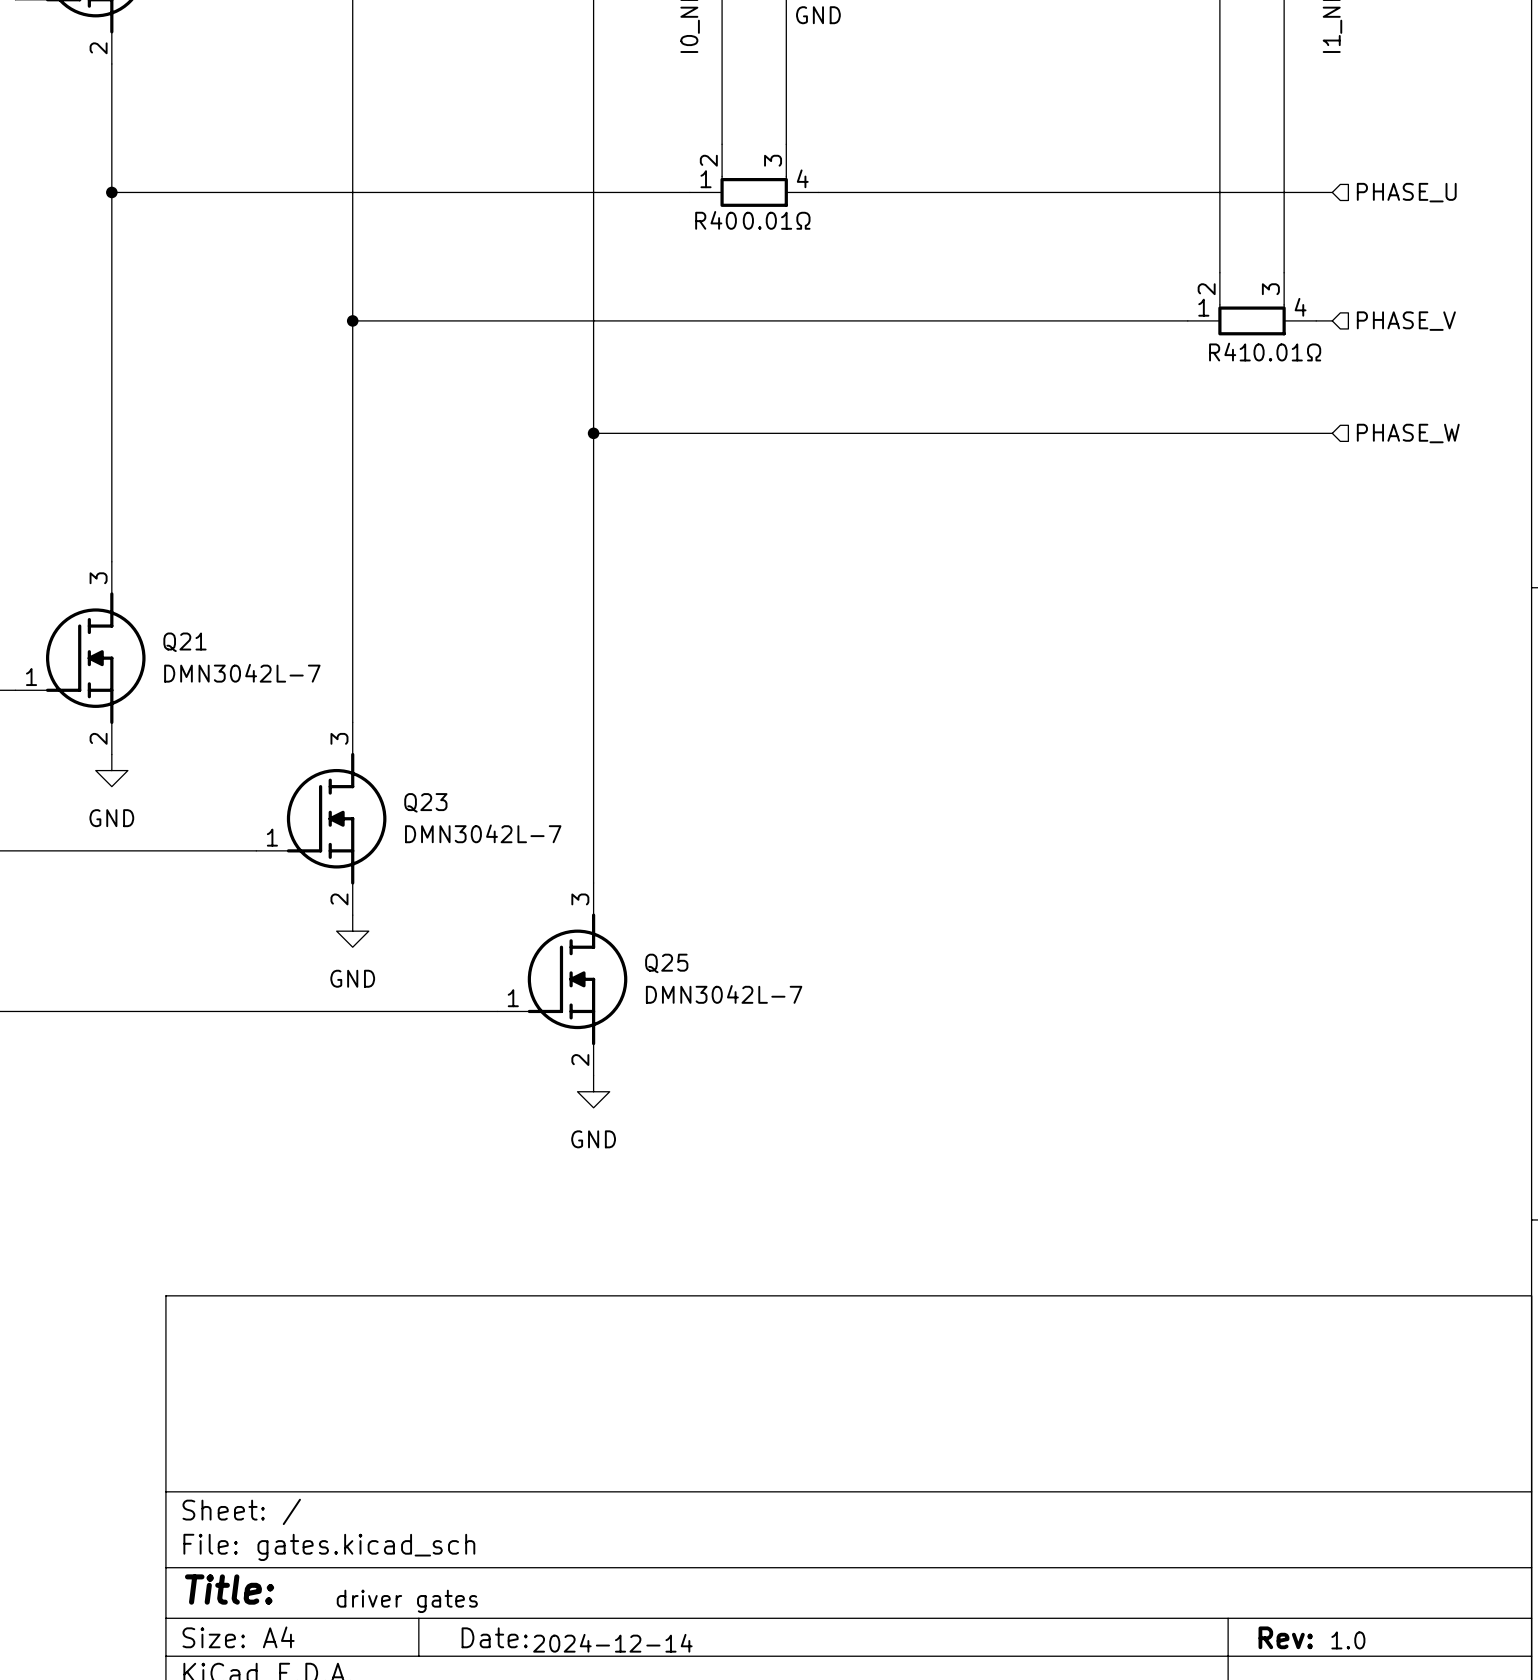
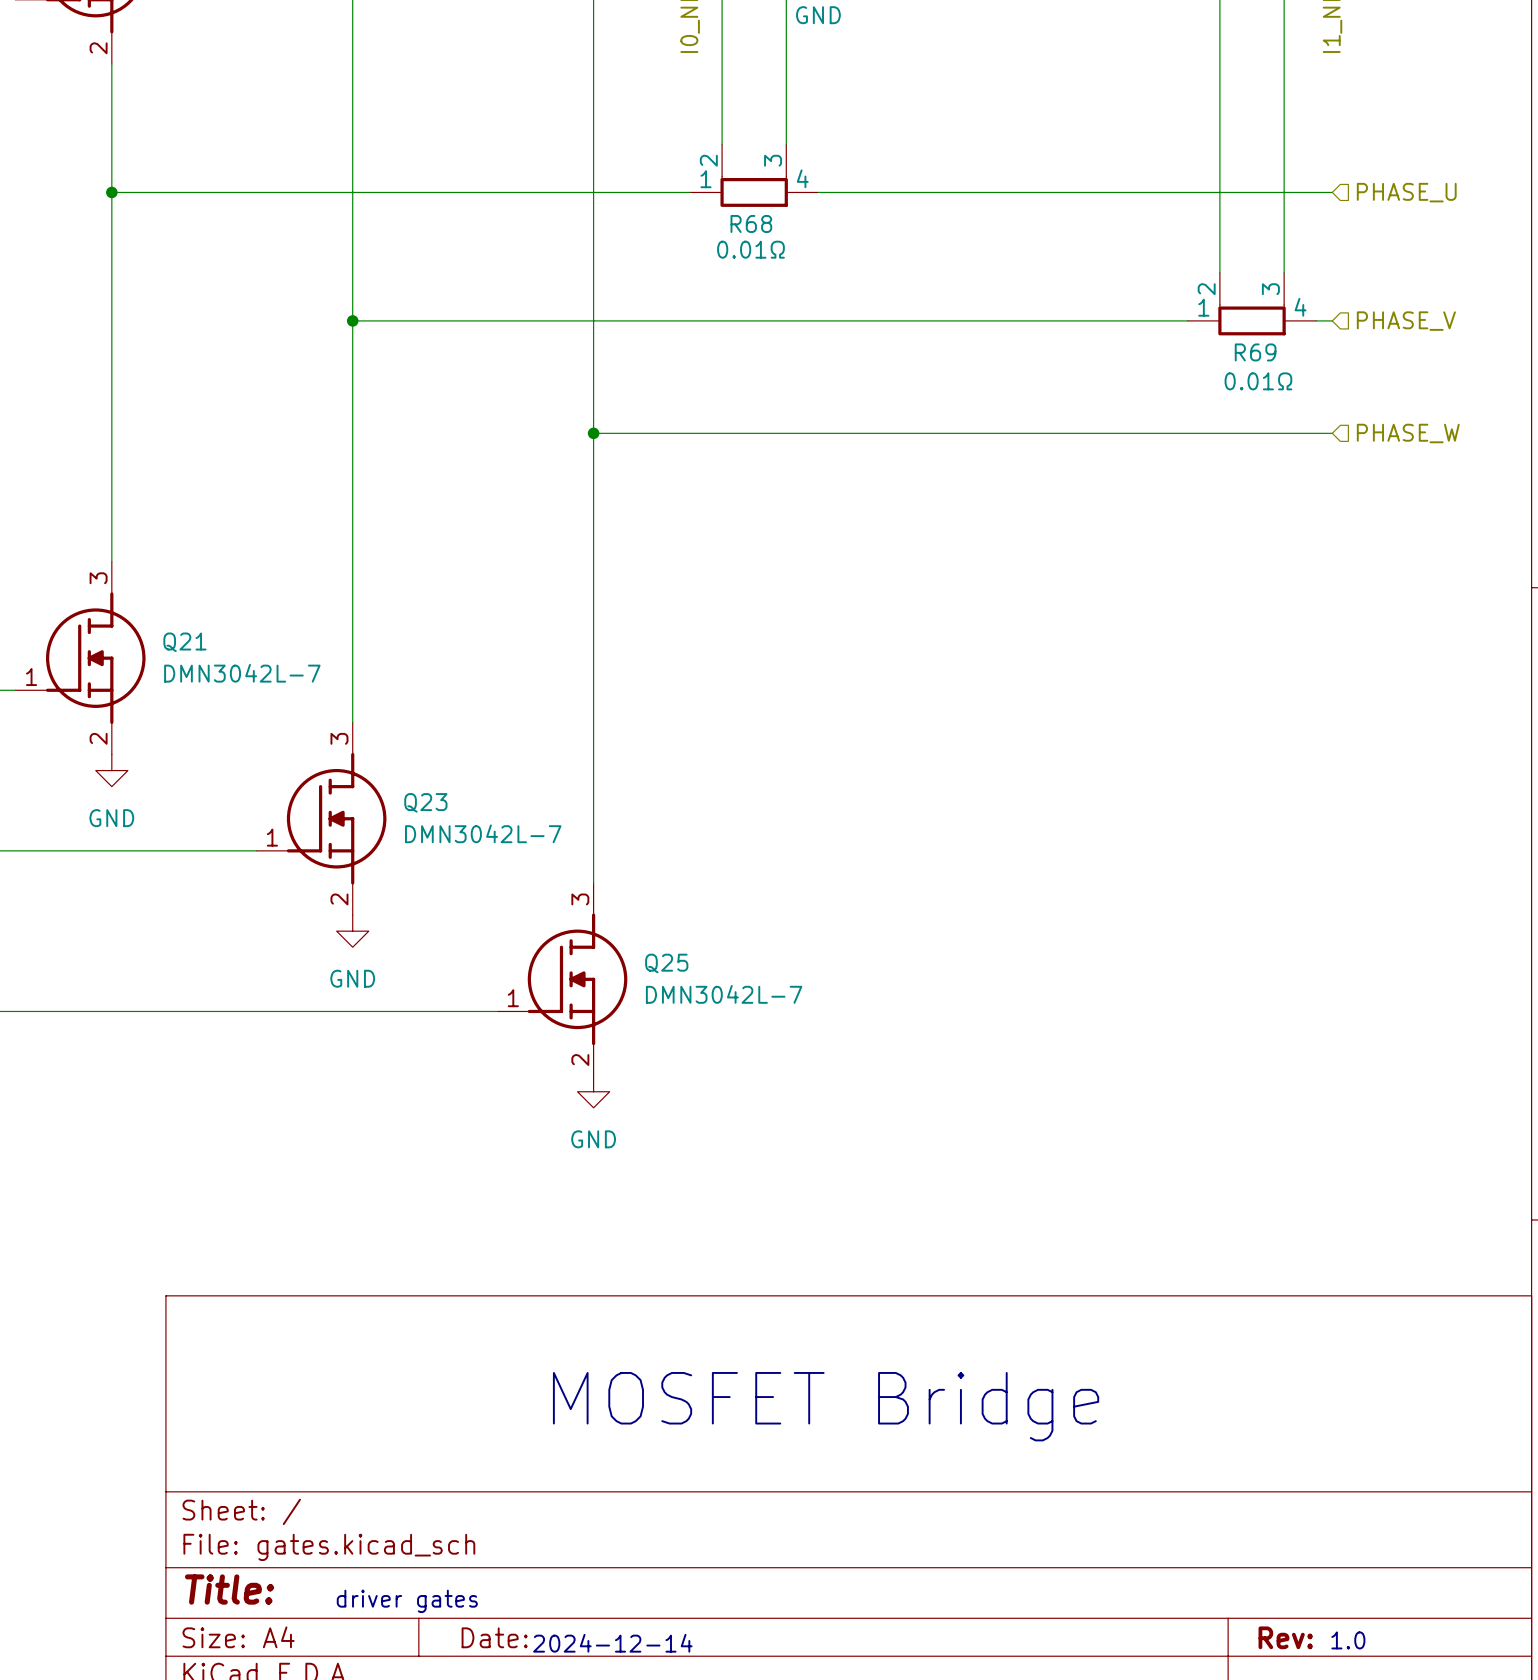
R40 name: R40 (716, 220) -> R68 (751, 223)
R40 value position: 0.01Ω (776, 220) -> 0.01Ω (750, 249)
R41 name: R41 (1229, 352) -> R69 (1255, 352)
R41 value position: 0.01Ω (1287, 352) -> 0.01Ω (1258, 381)
text: none -> MOSFET Bridge (826, 1406)

